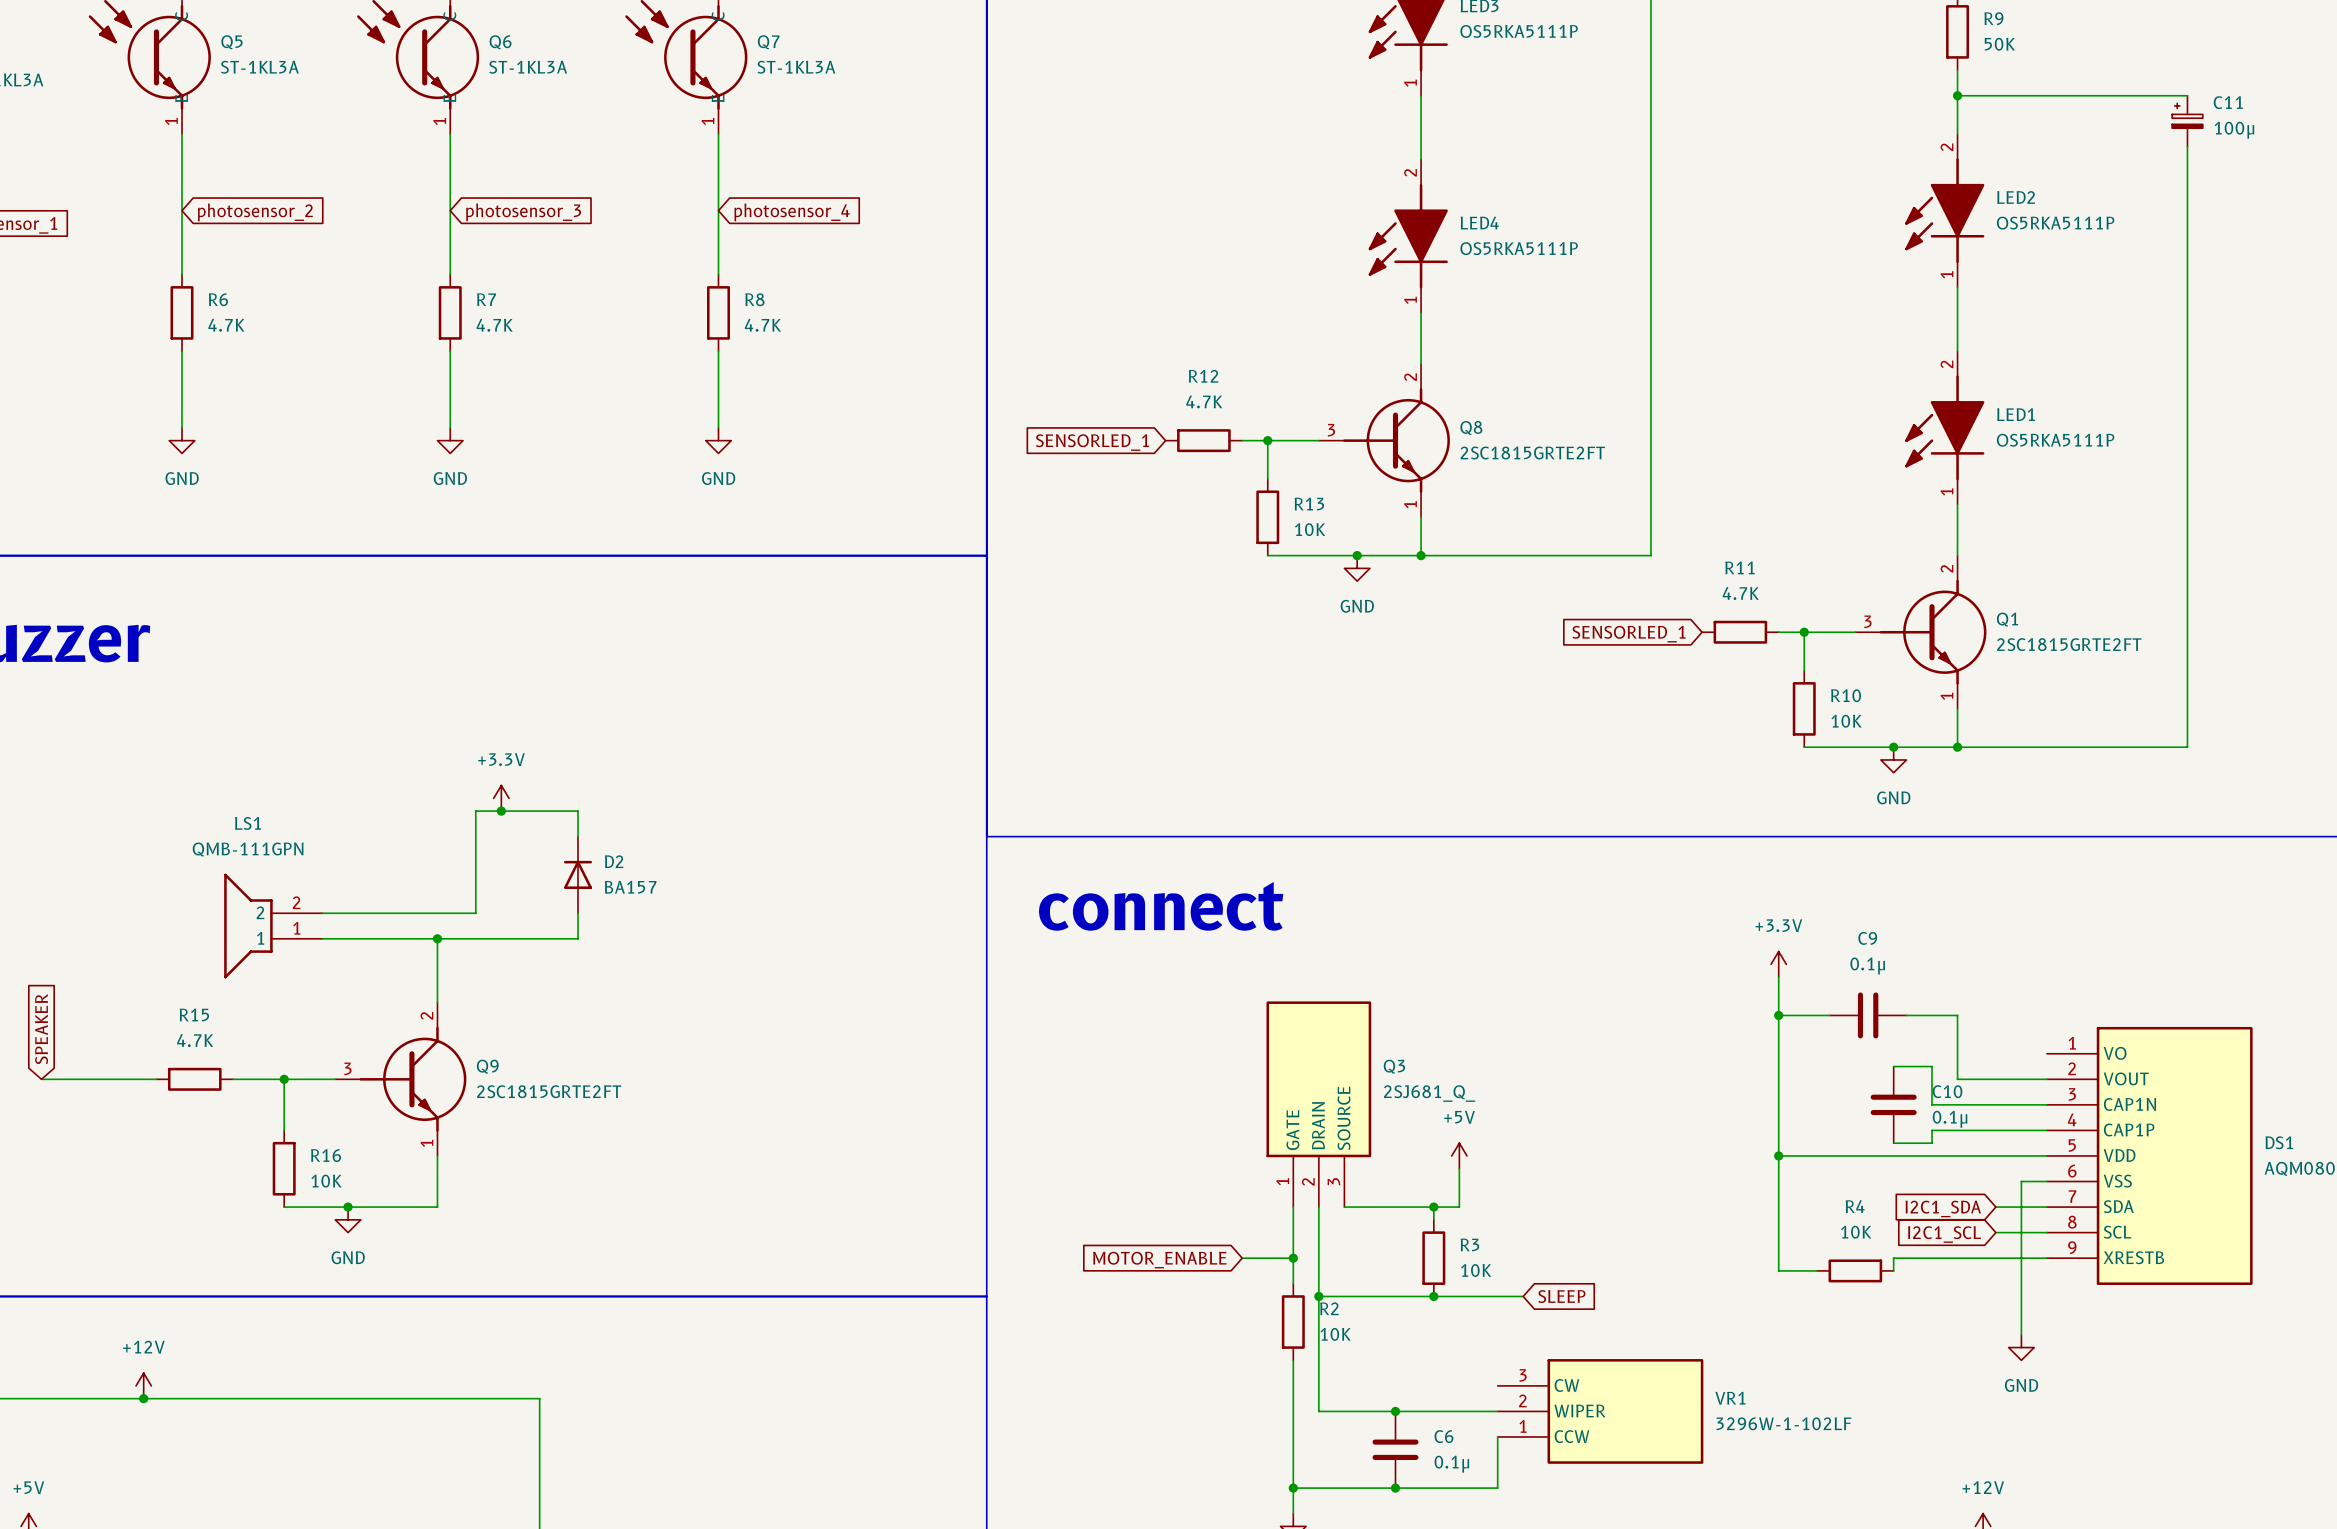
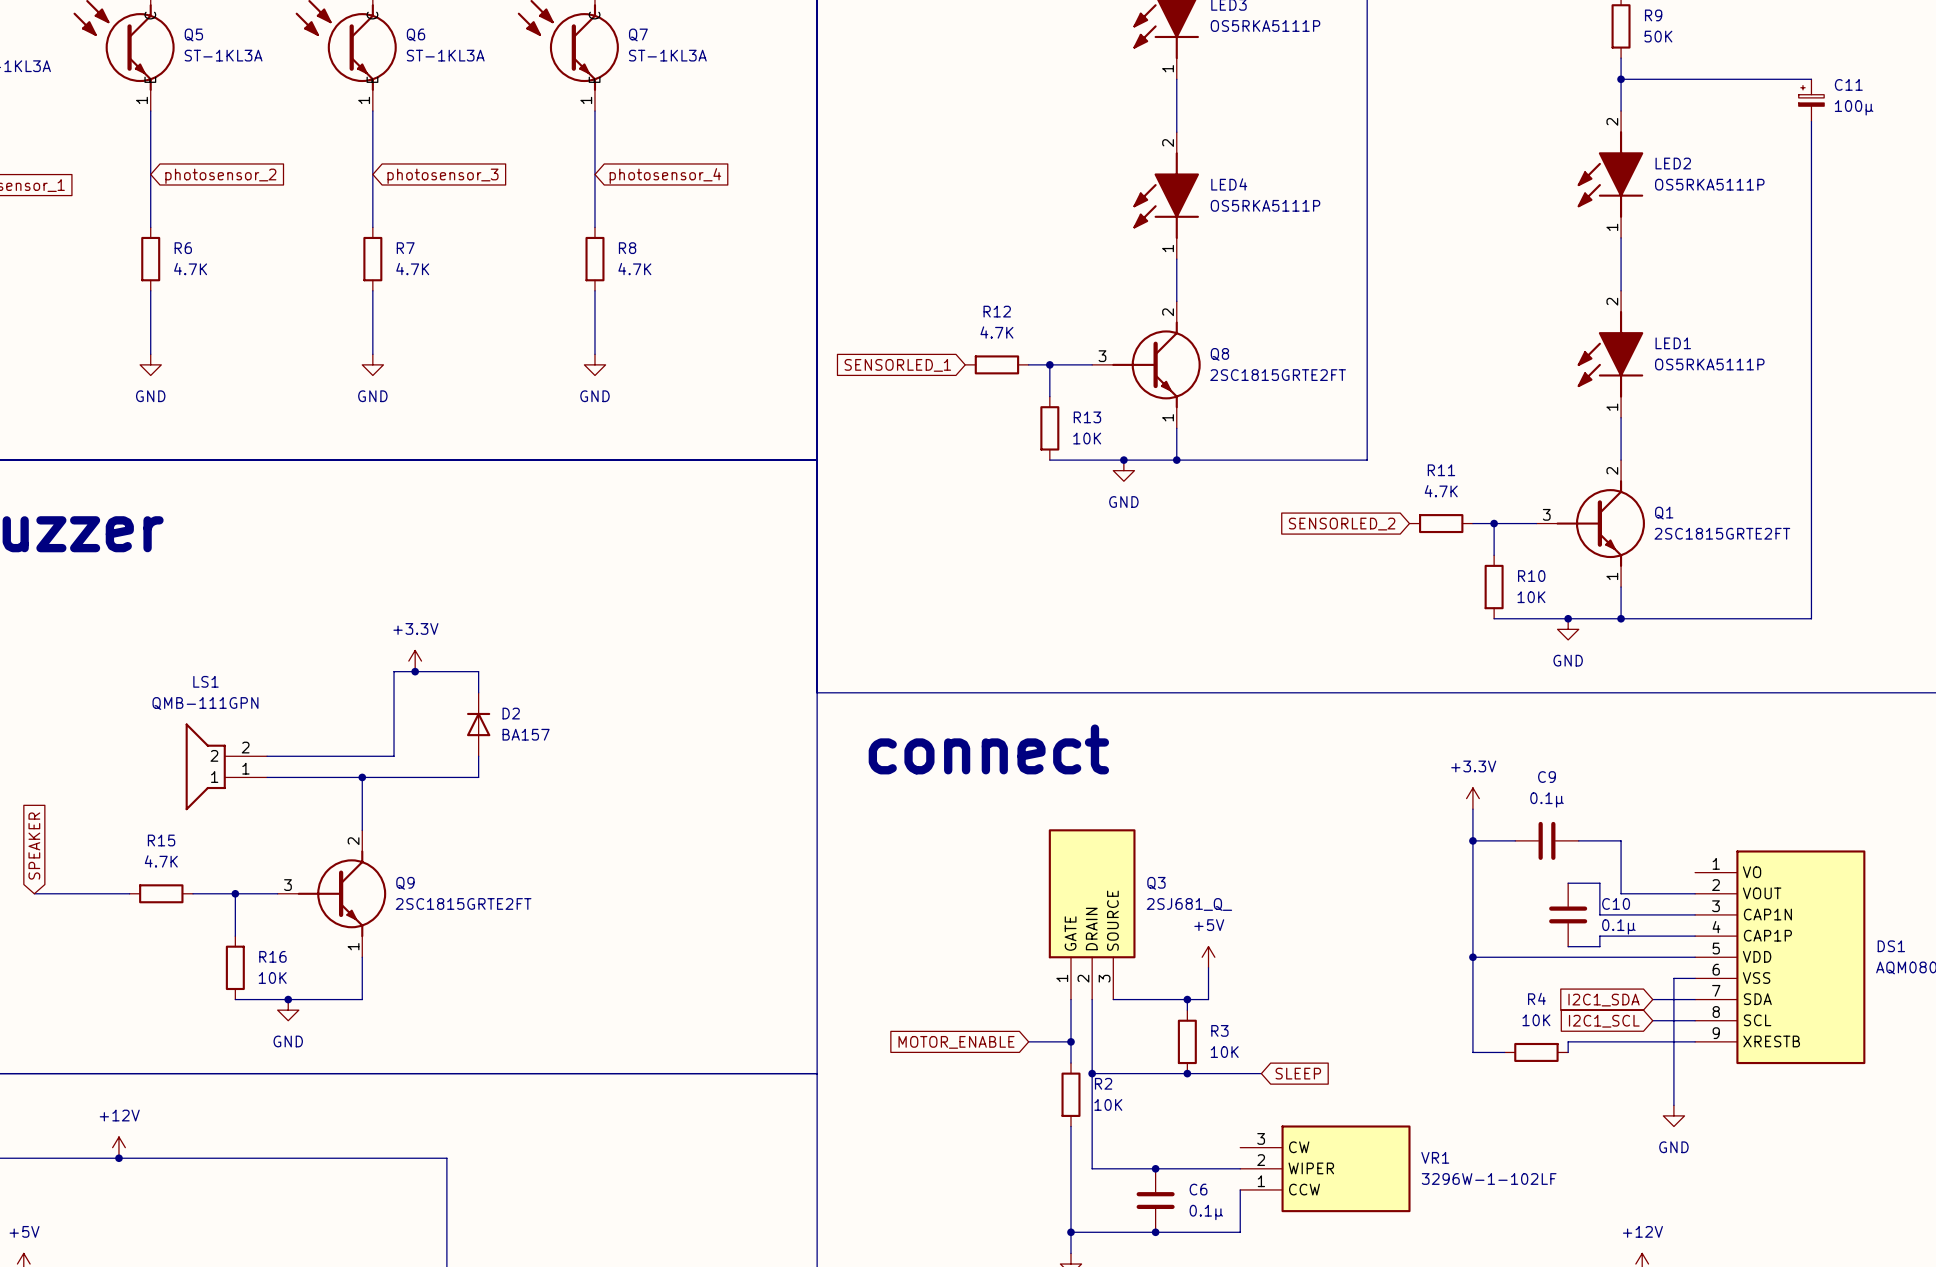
global label: SENSORLED_1 (1629, 634) -> SENSORLED_2 (1342, 524)

